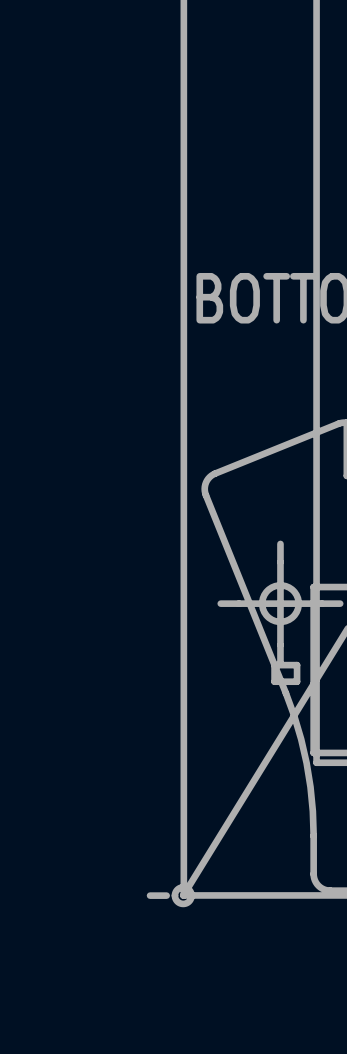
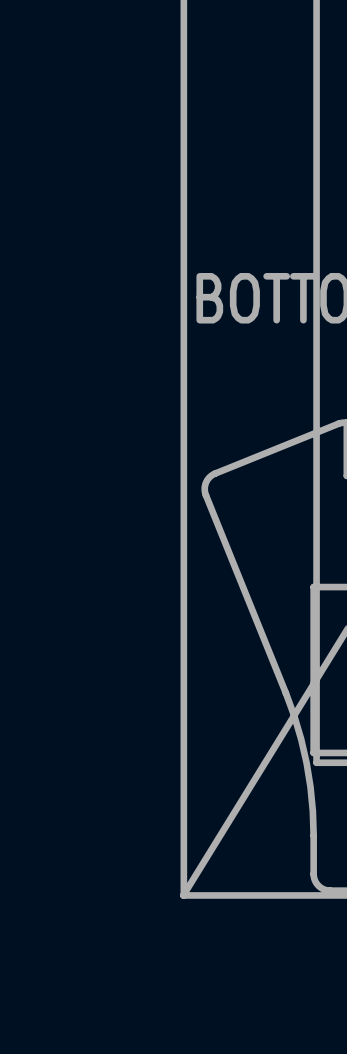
line: (280, 543) (280, 663) -> none
drawing: [258, 582, 303, 626] -> none
line: (220, 603) (340, 603) -> none
line: (274, 665) (297, 665) (297, 681) (274, 681) (274, 665) -> none
line: (150, 895) (166, 895) -> none
line: (174, 895) (177, 889) (183, 887) (189, 889) (191, 895) (189, 901) (183, 903) (177, 901) (174, 895) -> none

